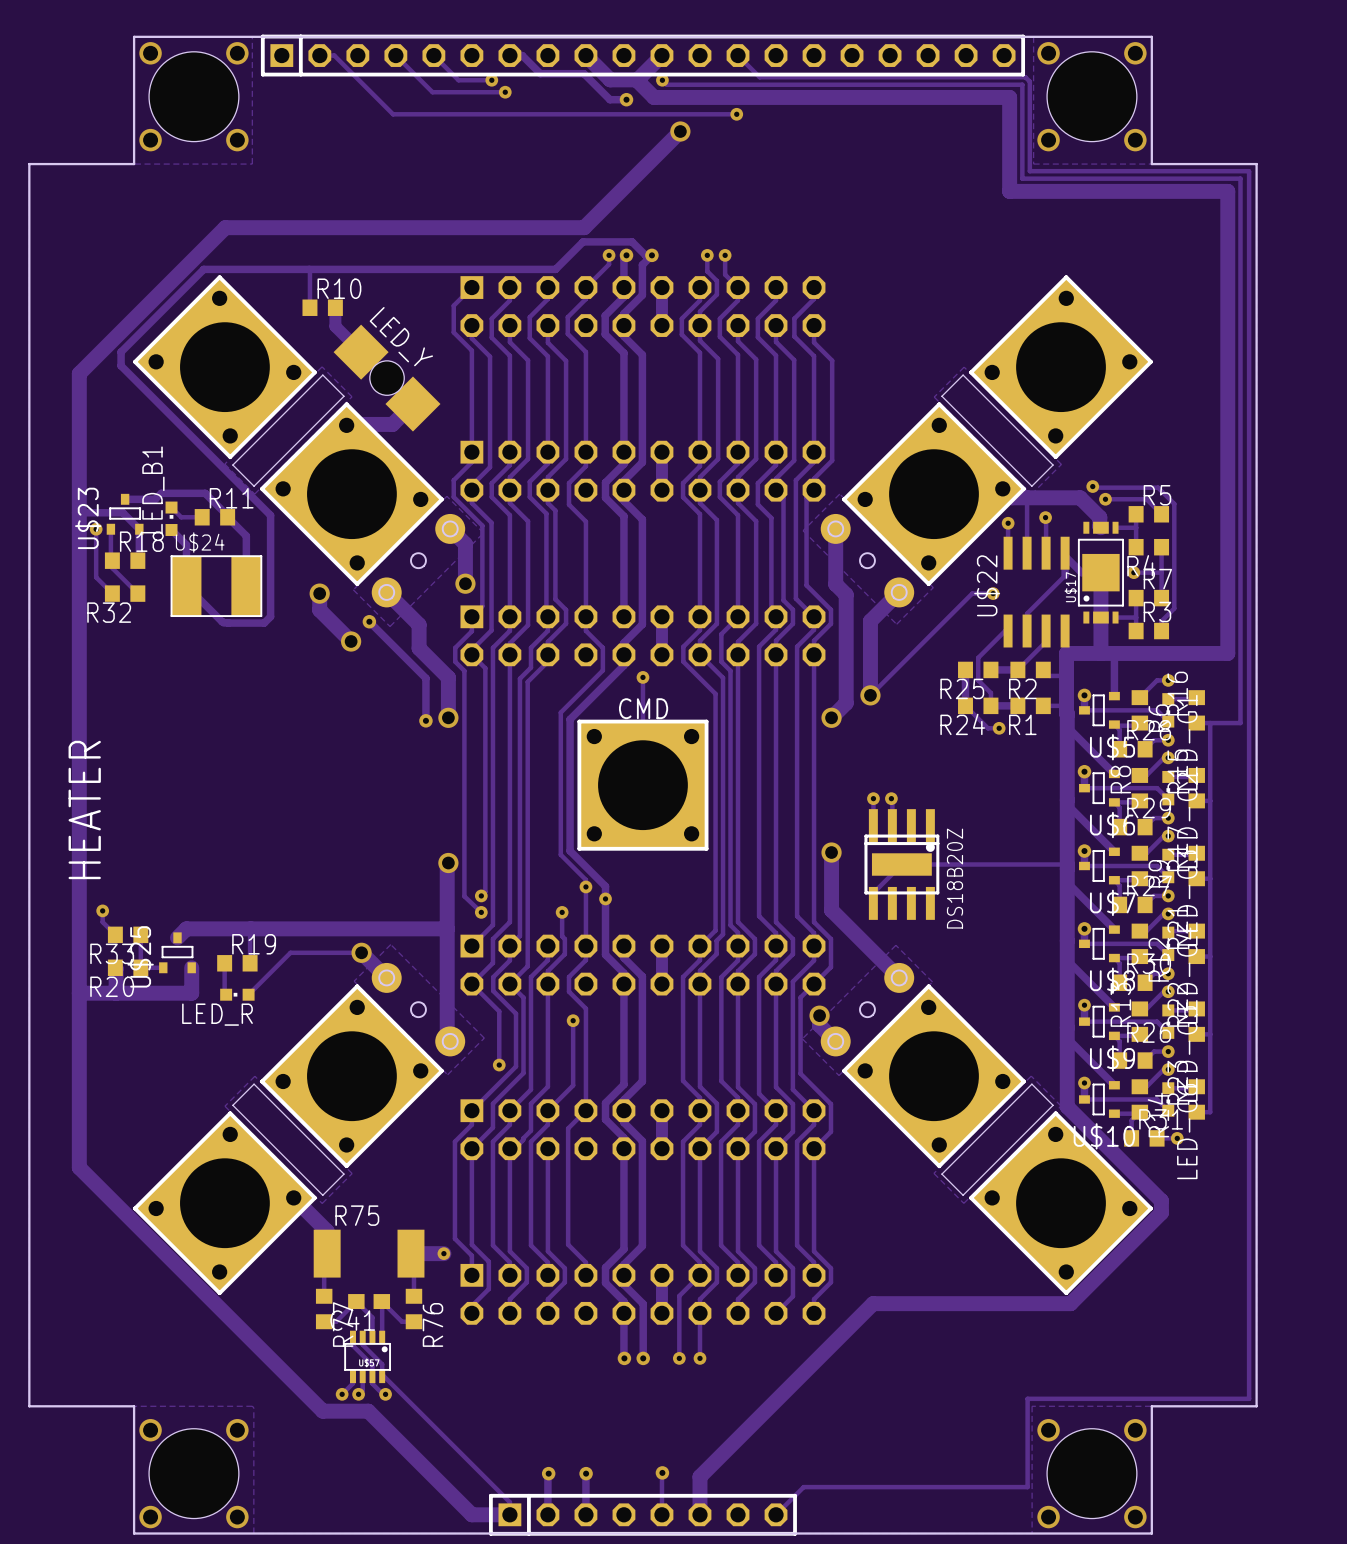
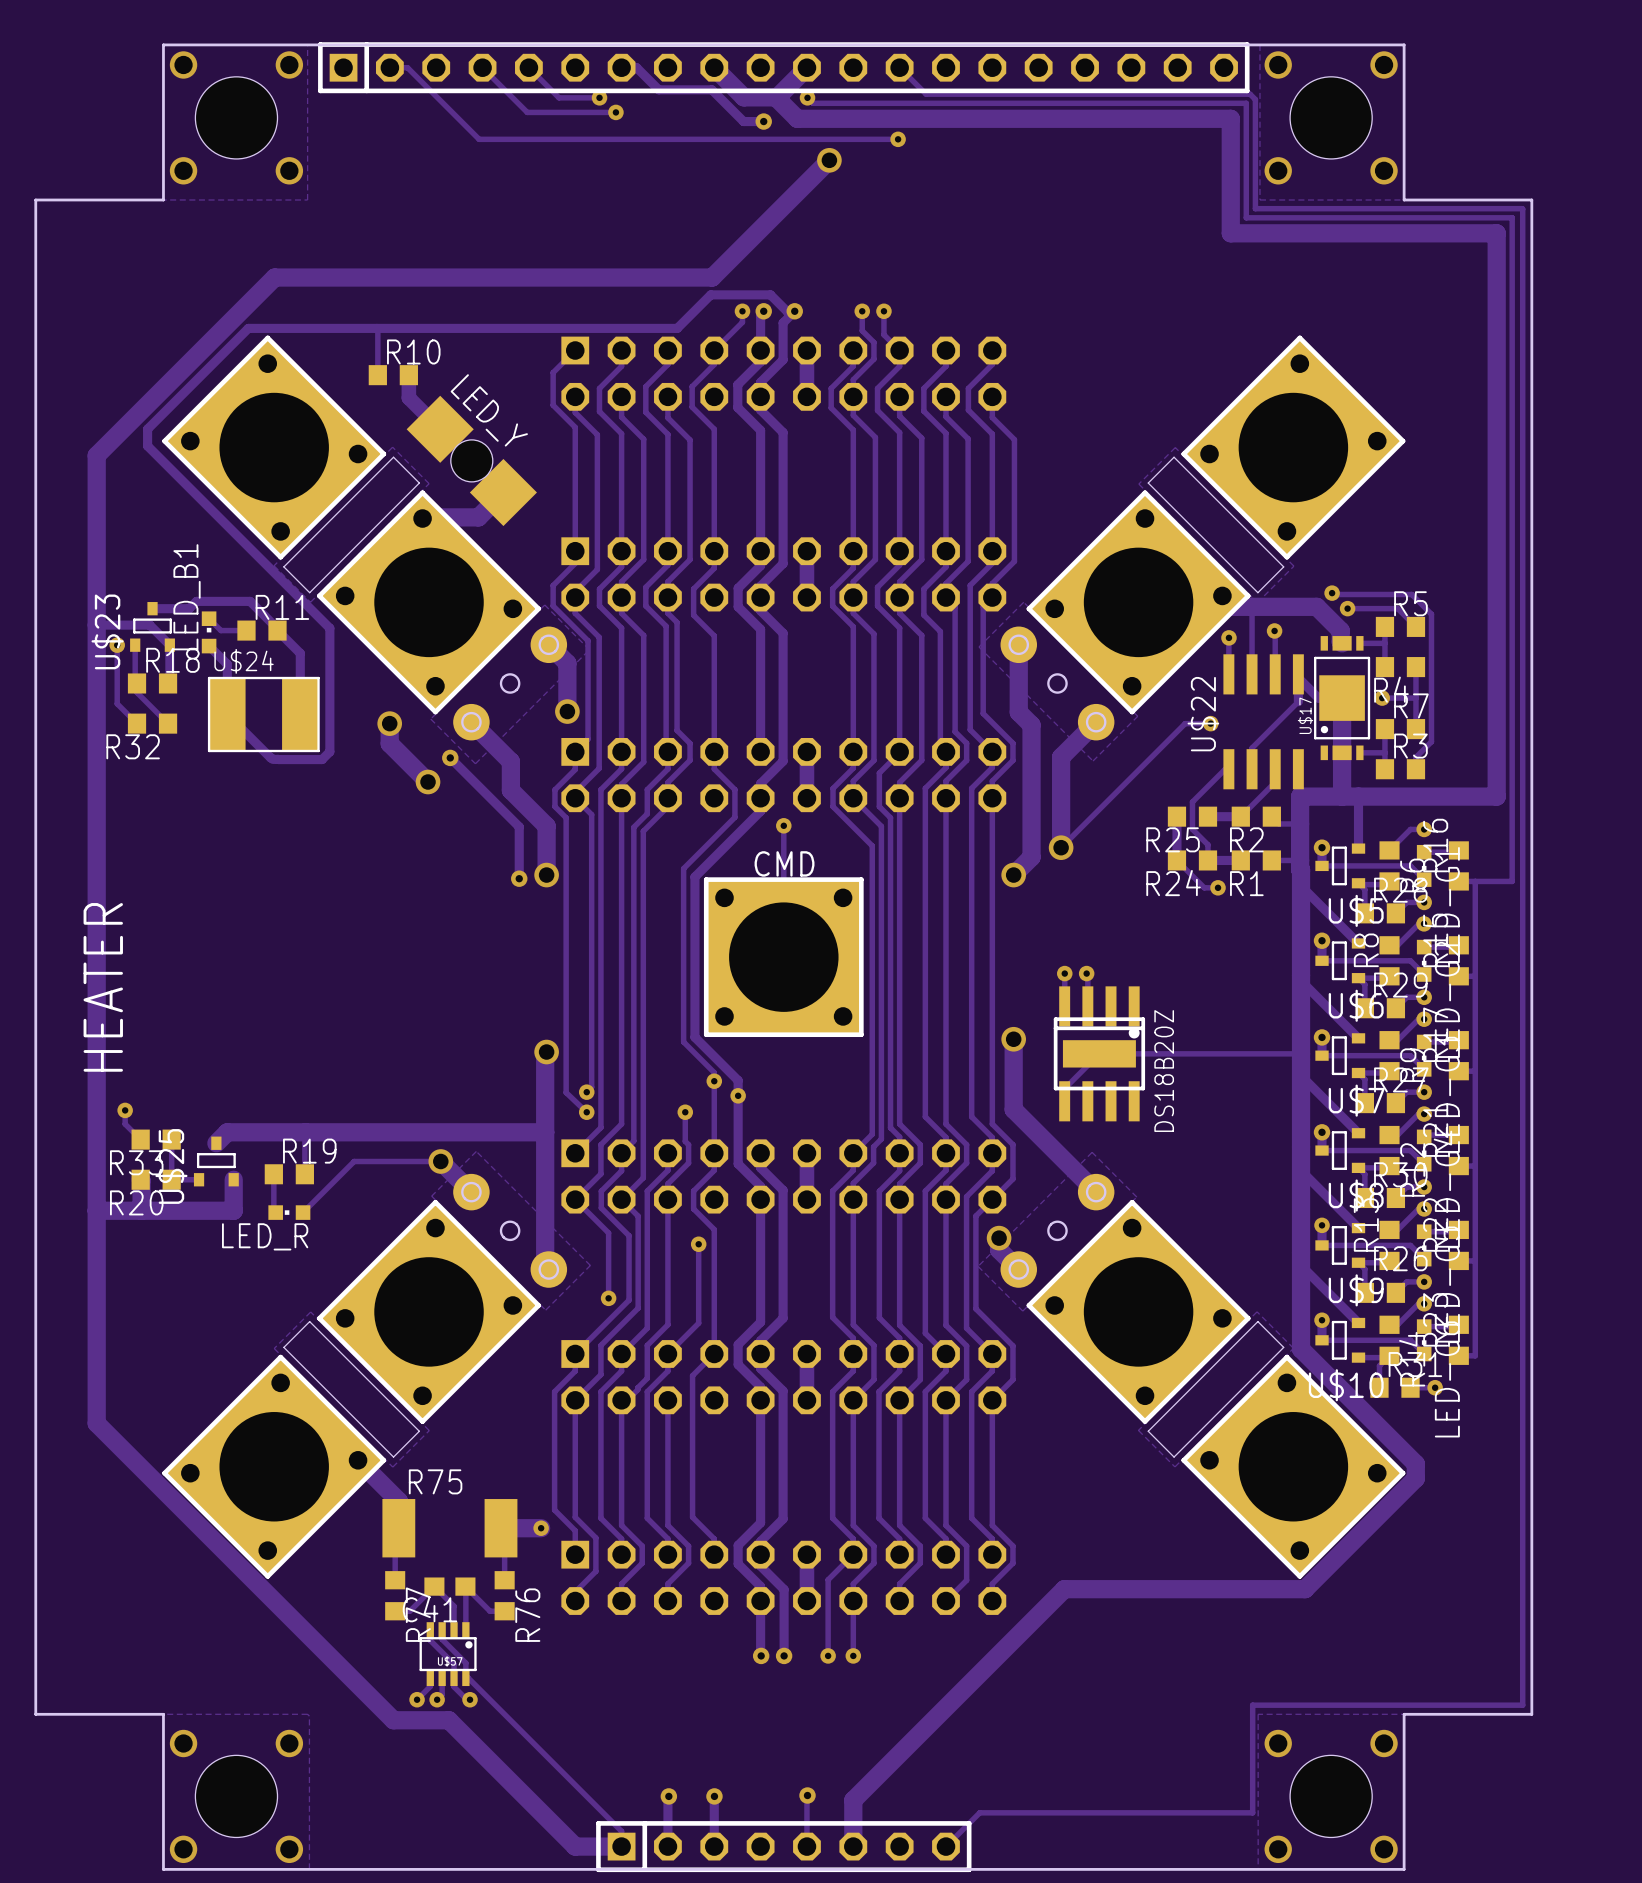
hole size: [149, 51, 239, 142] -> [195, 76, 278, 159]
hole size: [1047, 51, 1137, 142] -> [1290, 76, 1373, 159]
hole size: [149, 1428, 239, 1519] -> [195, 1755, 278, 1838]
hole size: [1047, 1428, 1137, 1519] -> [1290, 1755, 1373, 1838]

